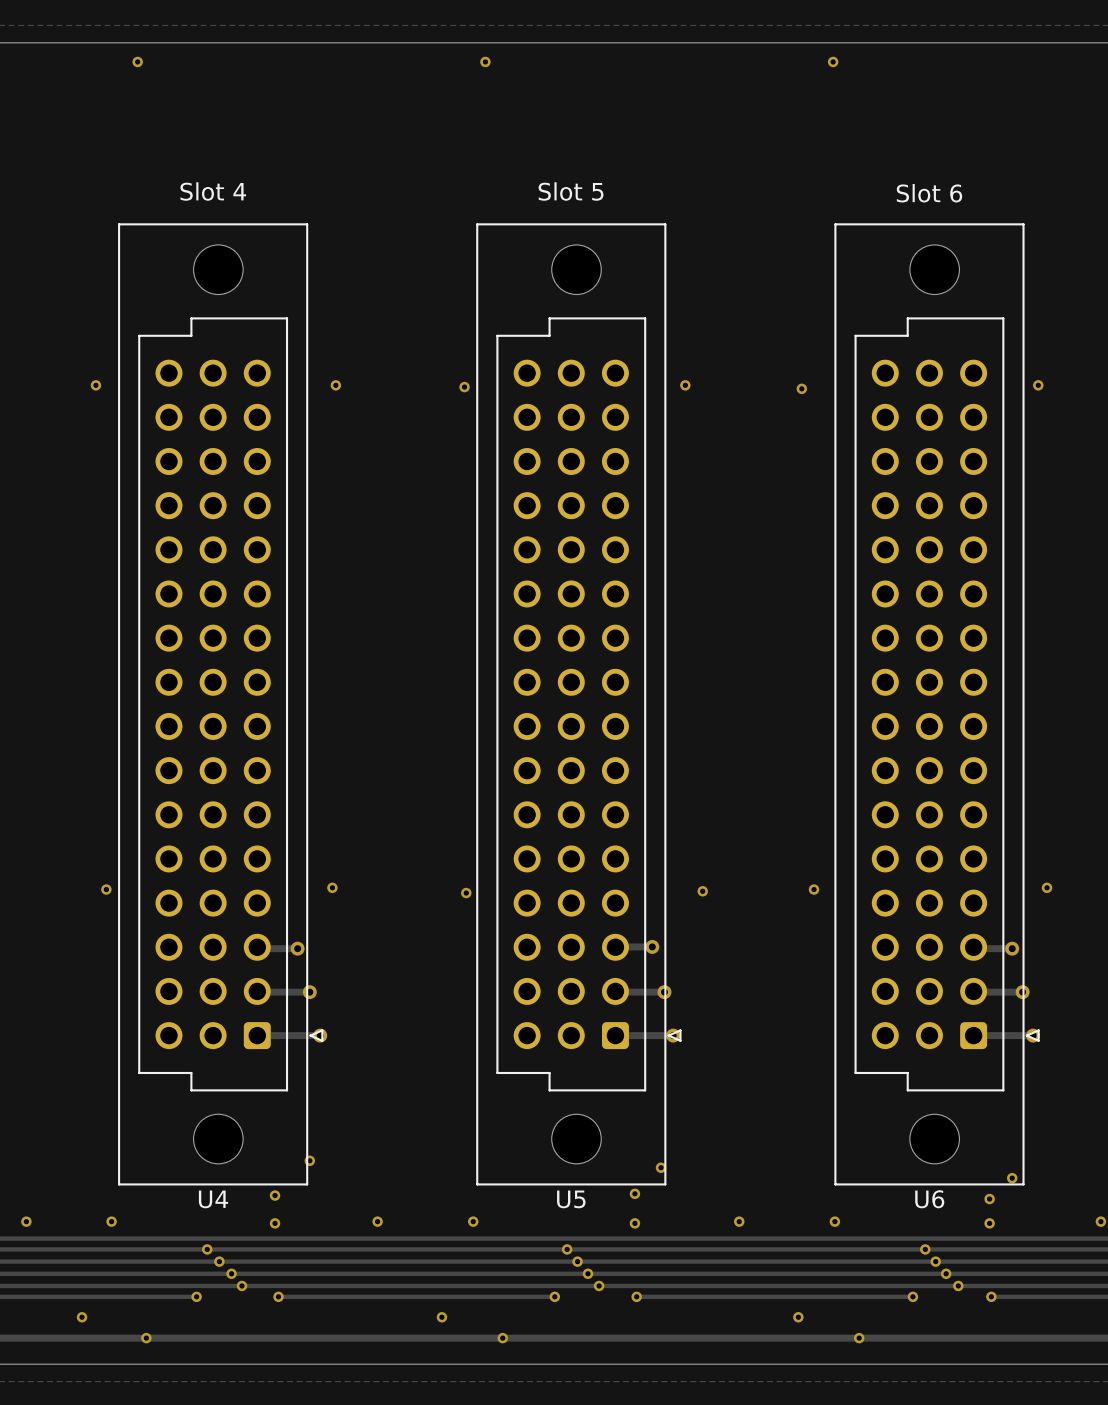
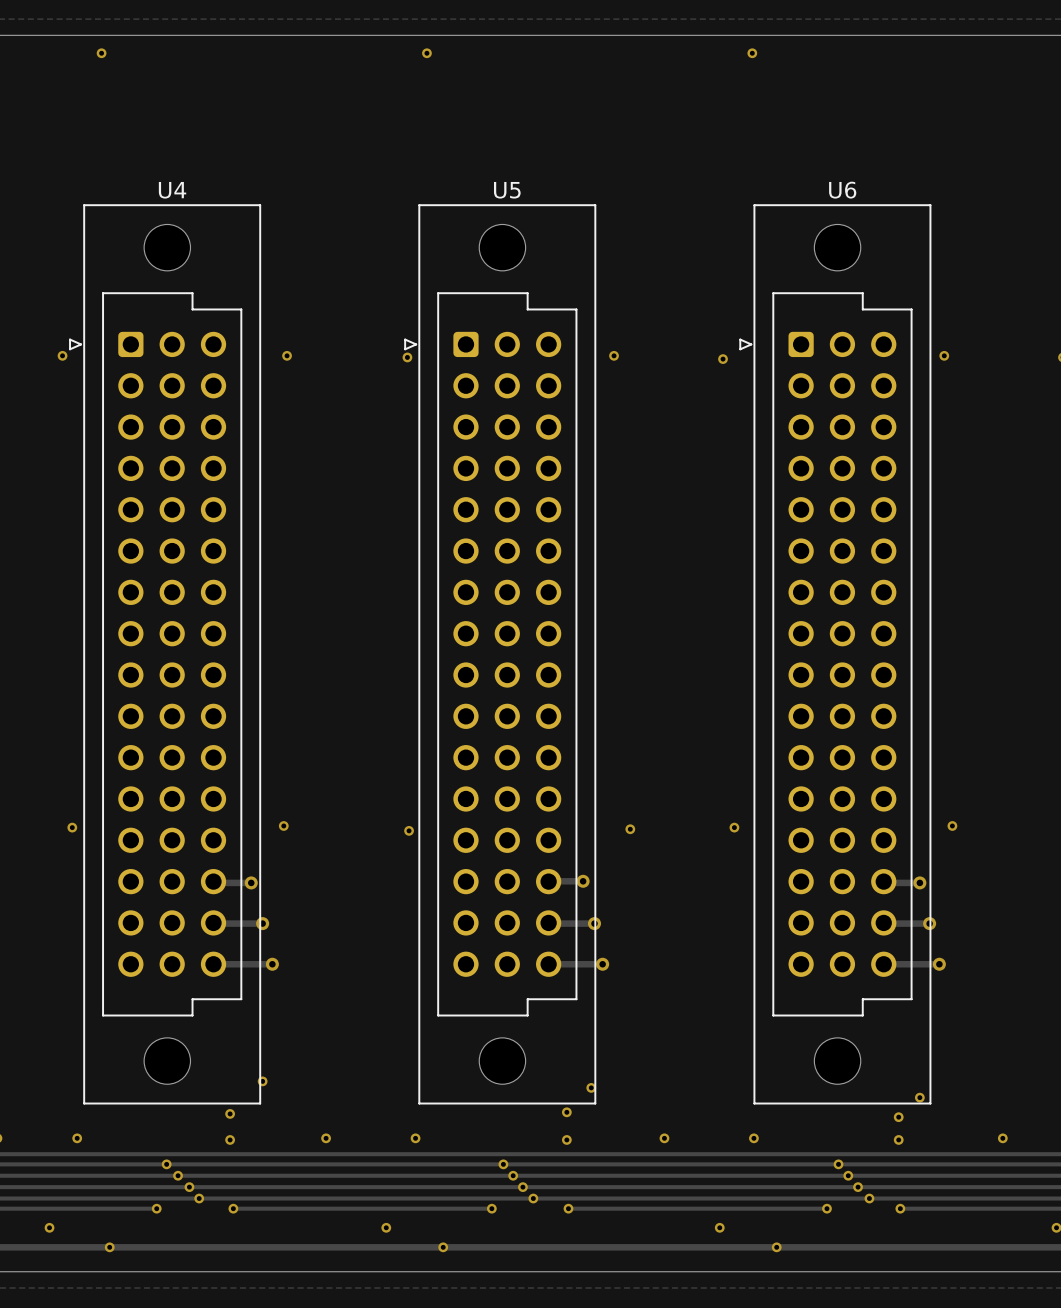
text: Slot 4 (213, 191) -> none
text: Slot 5 (571, 191) -> none
text: Slot 6 (929, 193) -> none
U4 rotation: 0° (220, 704) -> 180° (165, 654)
U5 rotation: 0° (578, 704) -> 180° (500, 654)
U6 rotation: 0° (937, 704) -> 180° (835, 654)

